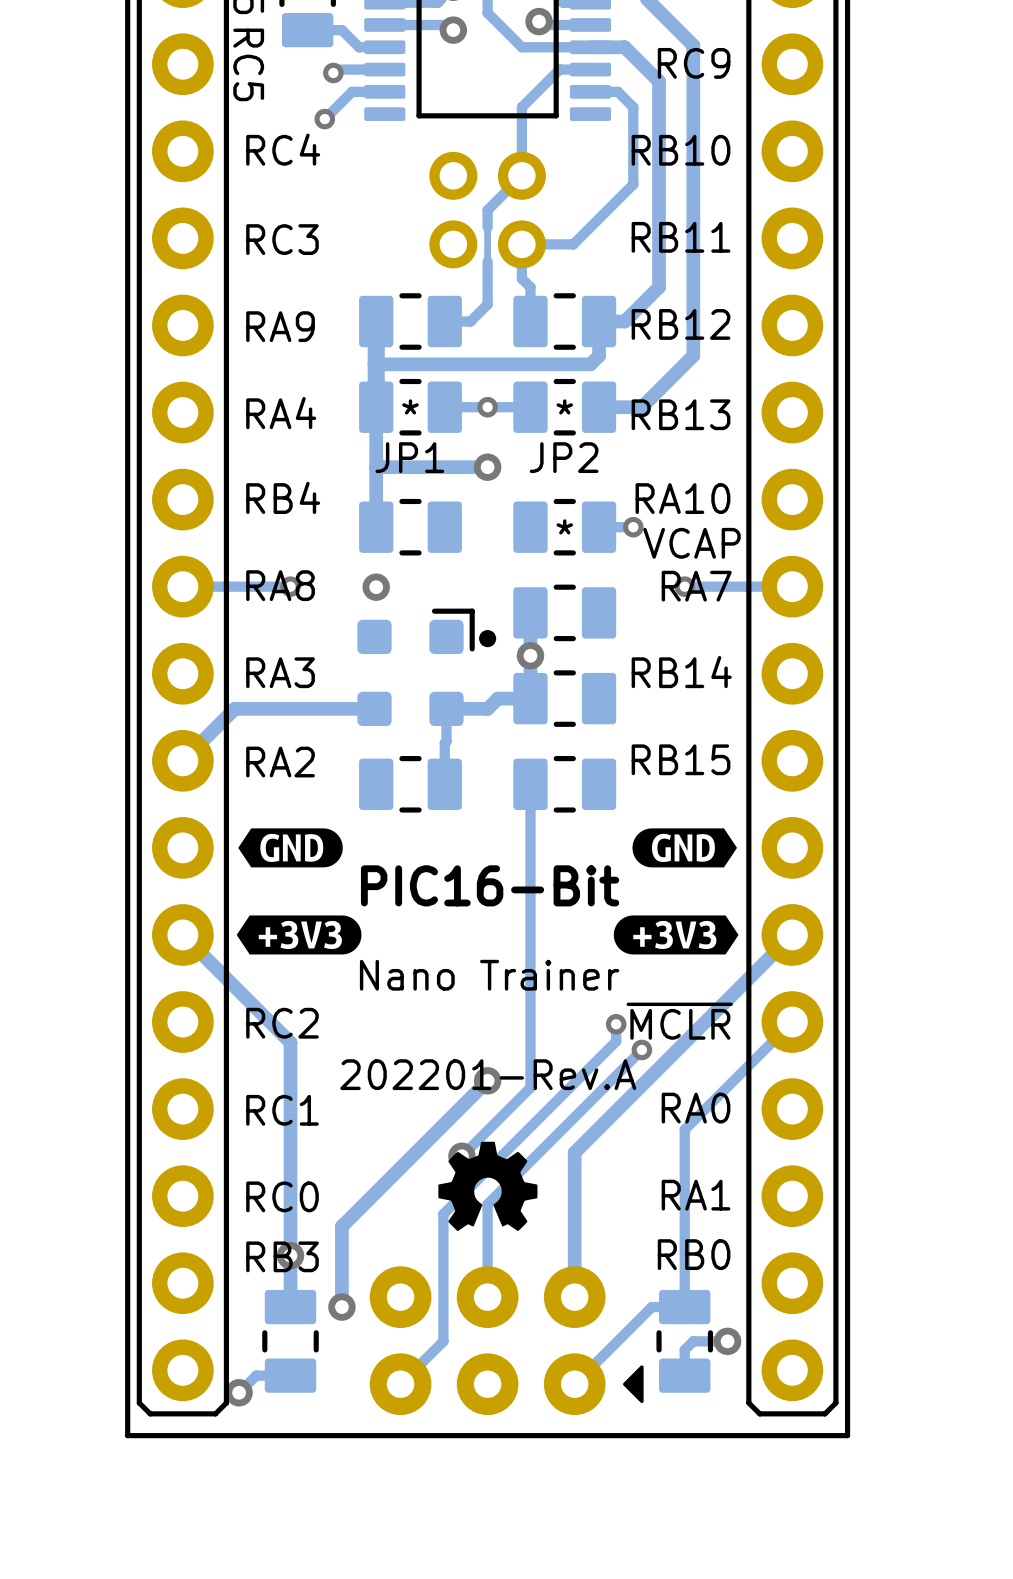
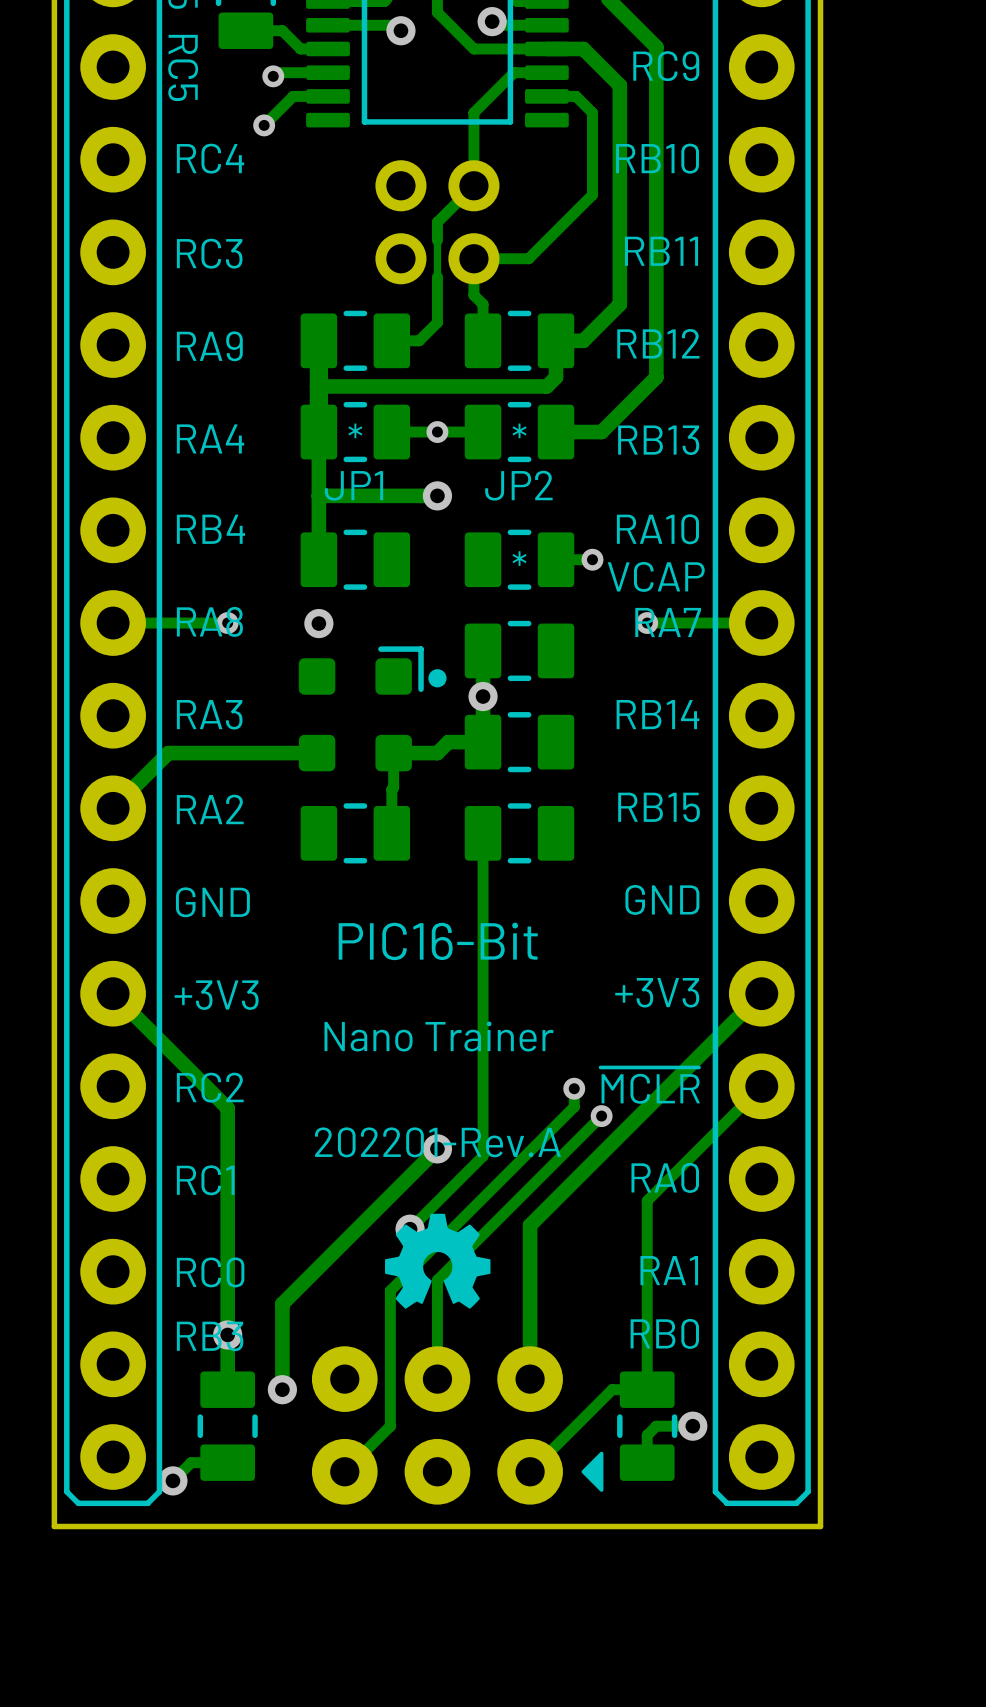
drawing: [238, 828, 343, 868] -> none
drawing: [632, 828, 738, 868] -> none
text: none -> GND (662, 899)
text: none -> GND (212, 902)
drawing: [236, 915, 362, 955] -> none
drawing: [613, 915, 739, 955] -> none
text: none -> +3V3 (657, 992)
text: none -> +3V3 (216, 995)

